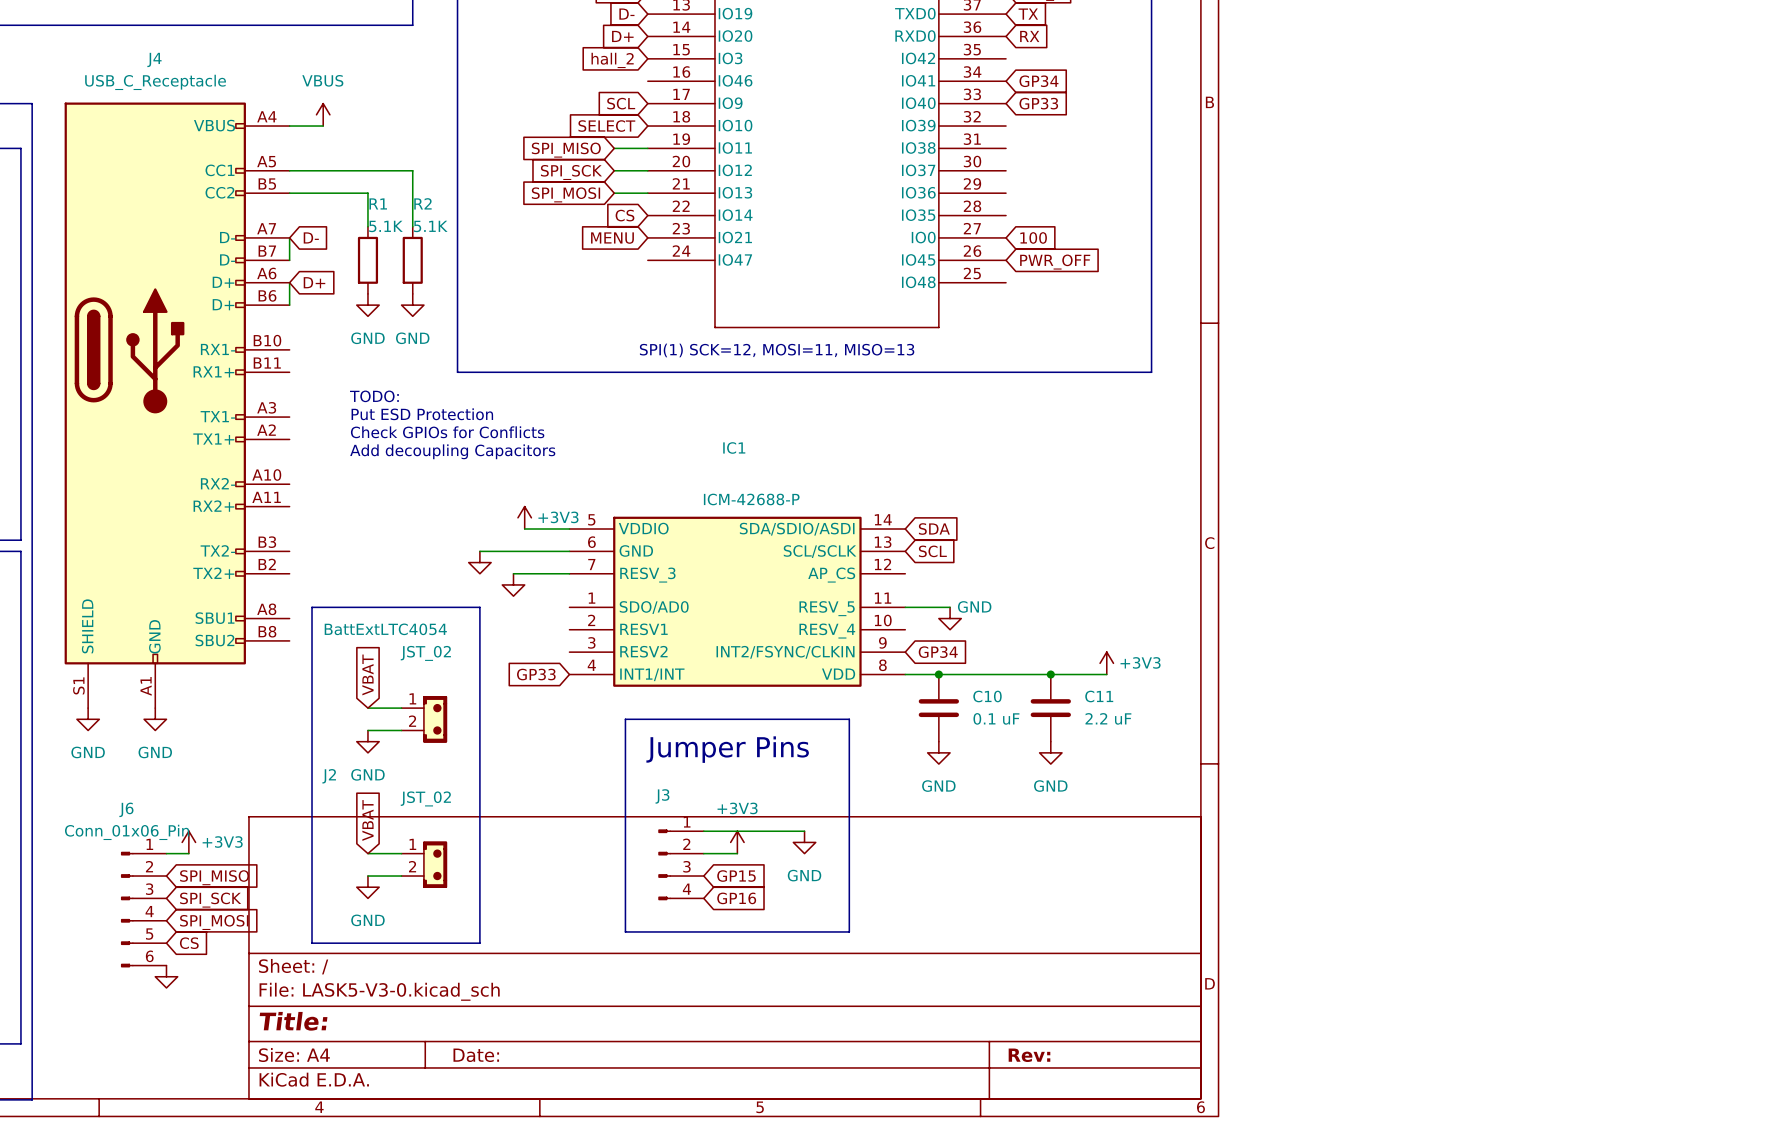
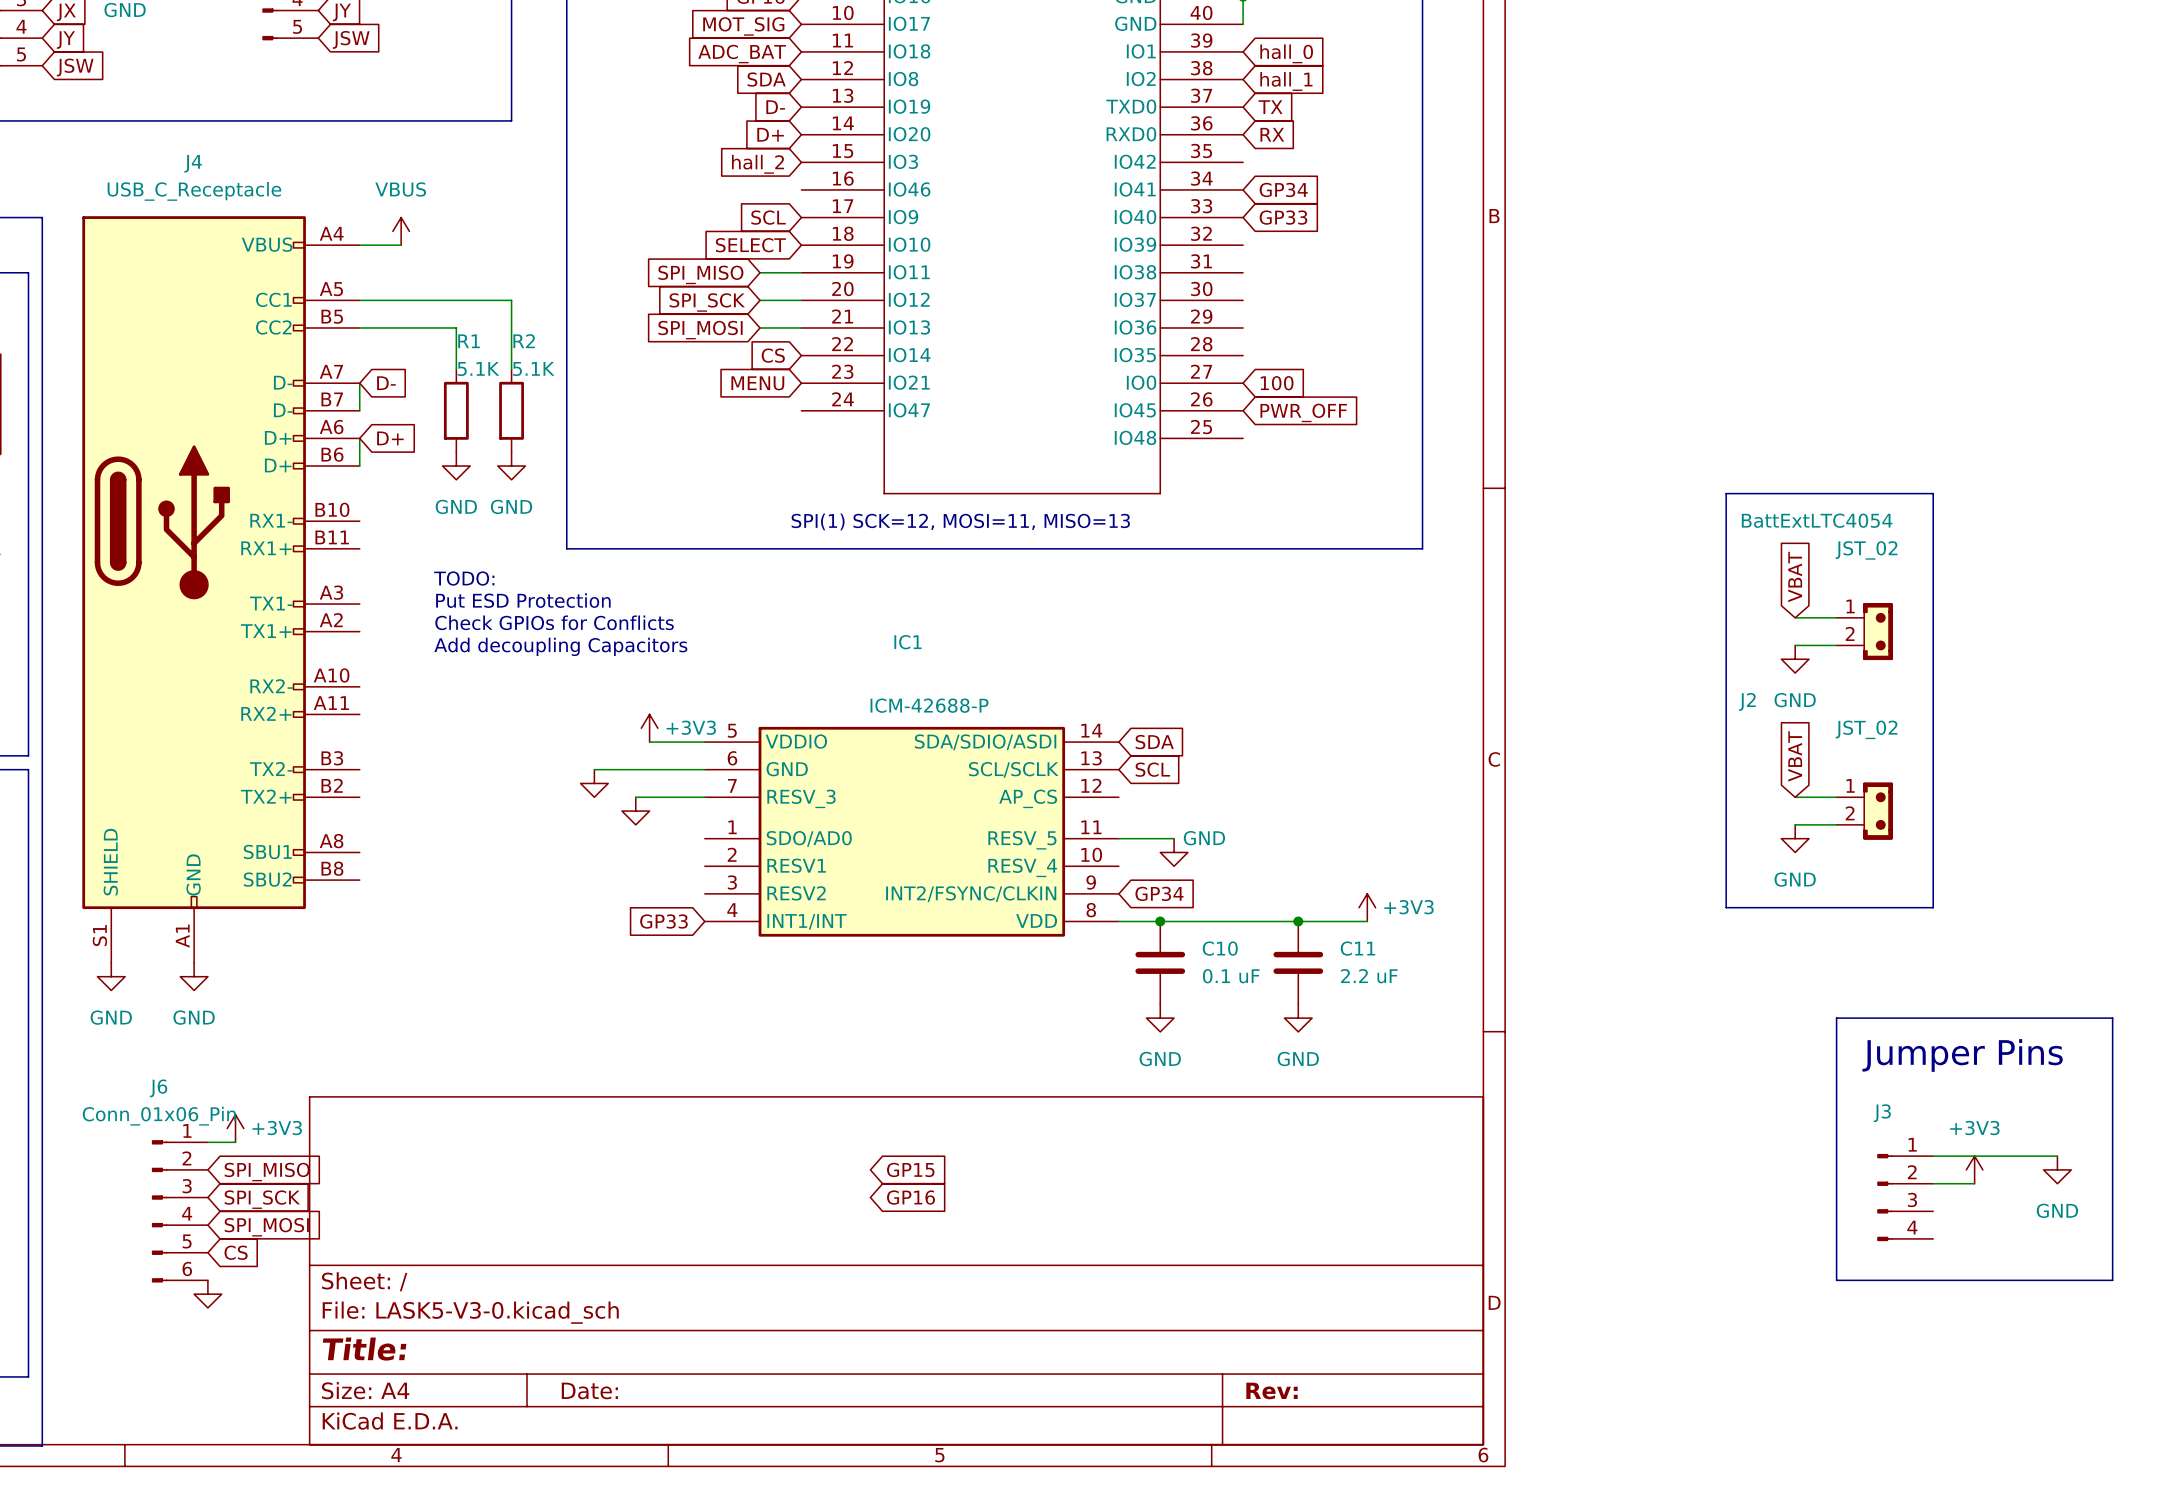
line: none -> (1726, 493) (1933, 493) (1933, 907) (1726, 907) (1726, 493)
global label: none -> VBAT (1795, 576)
wire: none -> (1795, 617) (1836, 617)
wire: none -> (1795, 645) (1836, 645)
power symbol: none -> GND (1795, 659)
global label: none -> VBAT (1795, 756)
wire: none -> (1795, 797) (1836, 797)
wire: none -> (1795, 824) (1836, 824)
line: (312, 607) (479, 607) (479, 943) (312, 943) (312, 607) -> none
power symbol: none -> GND (1795, 838)
global label: VBAT (367, 674) -> none
wire: (367, 708) (401, 708) -> none
BattExtLTC4054 position: (423, 719) -> (1864, 631)
line: (625, 719) (849, 719) (849, 931) (625, 931) (625, 719) -> none
wire: (367, 730) (401, 730) -> none
power symbol: GND (367, 741) -> none
text: Jumper Pins (727, 749) -> none
line: none -> (1836, 1018) (2112, 1018) (2112, 1280) (1836, 1280) (1836, 1018)
text: none -> Jumper Pins (1962, 1055)
global label: VBAT (367, 820) -> none
wire: (703, 831) (804, 831) -> none
power symbol: +3V3 (737, 842) -> none
power symbol: GND (804, 842) -> none
wire: (367, 853) (401, 853) -> none
wire: (703, 853) (737, 853) -> none
J2 position: (423, 864) -> (1864, 811)
J3 position: (681, 864) -> (1905, 1197)
wire: none -> (1933, 1156) (2057, 1156)
wire: (367, 876) (401, 876) -> none
power symbol: none -> +3V3 (1974, 1169)
power symbol: none -> GND (2057, 1169)
power symbol: GND (367, 887) -> none
wire: none -> (1933, 1183) (1974, 1183)

